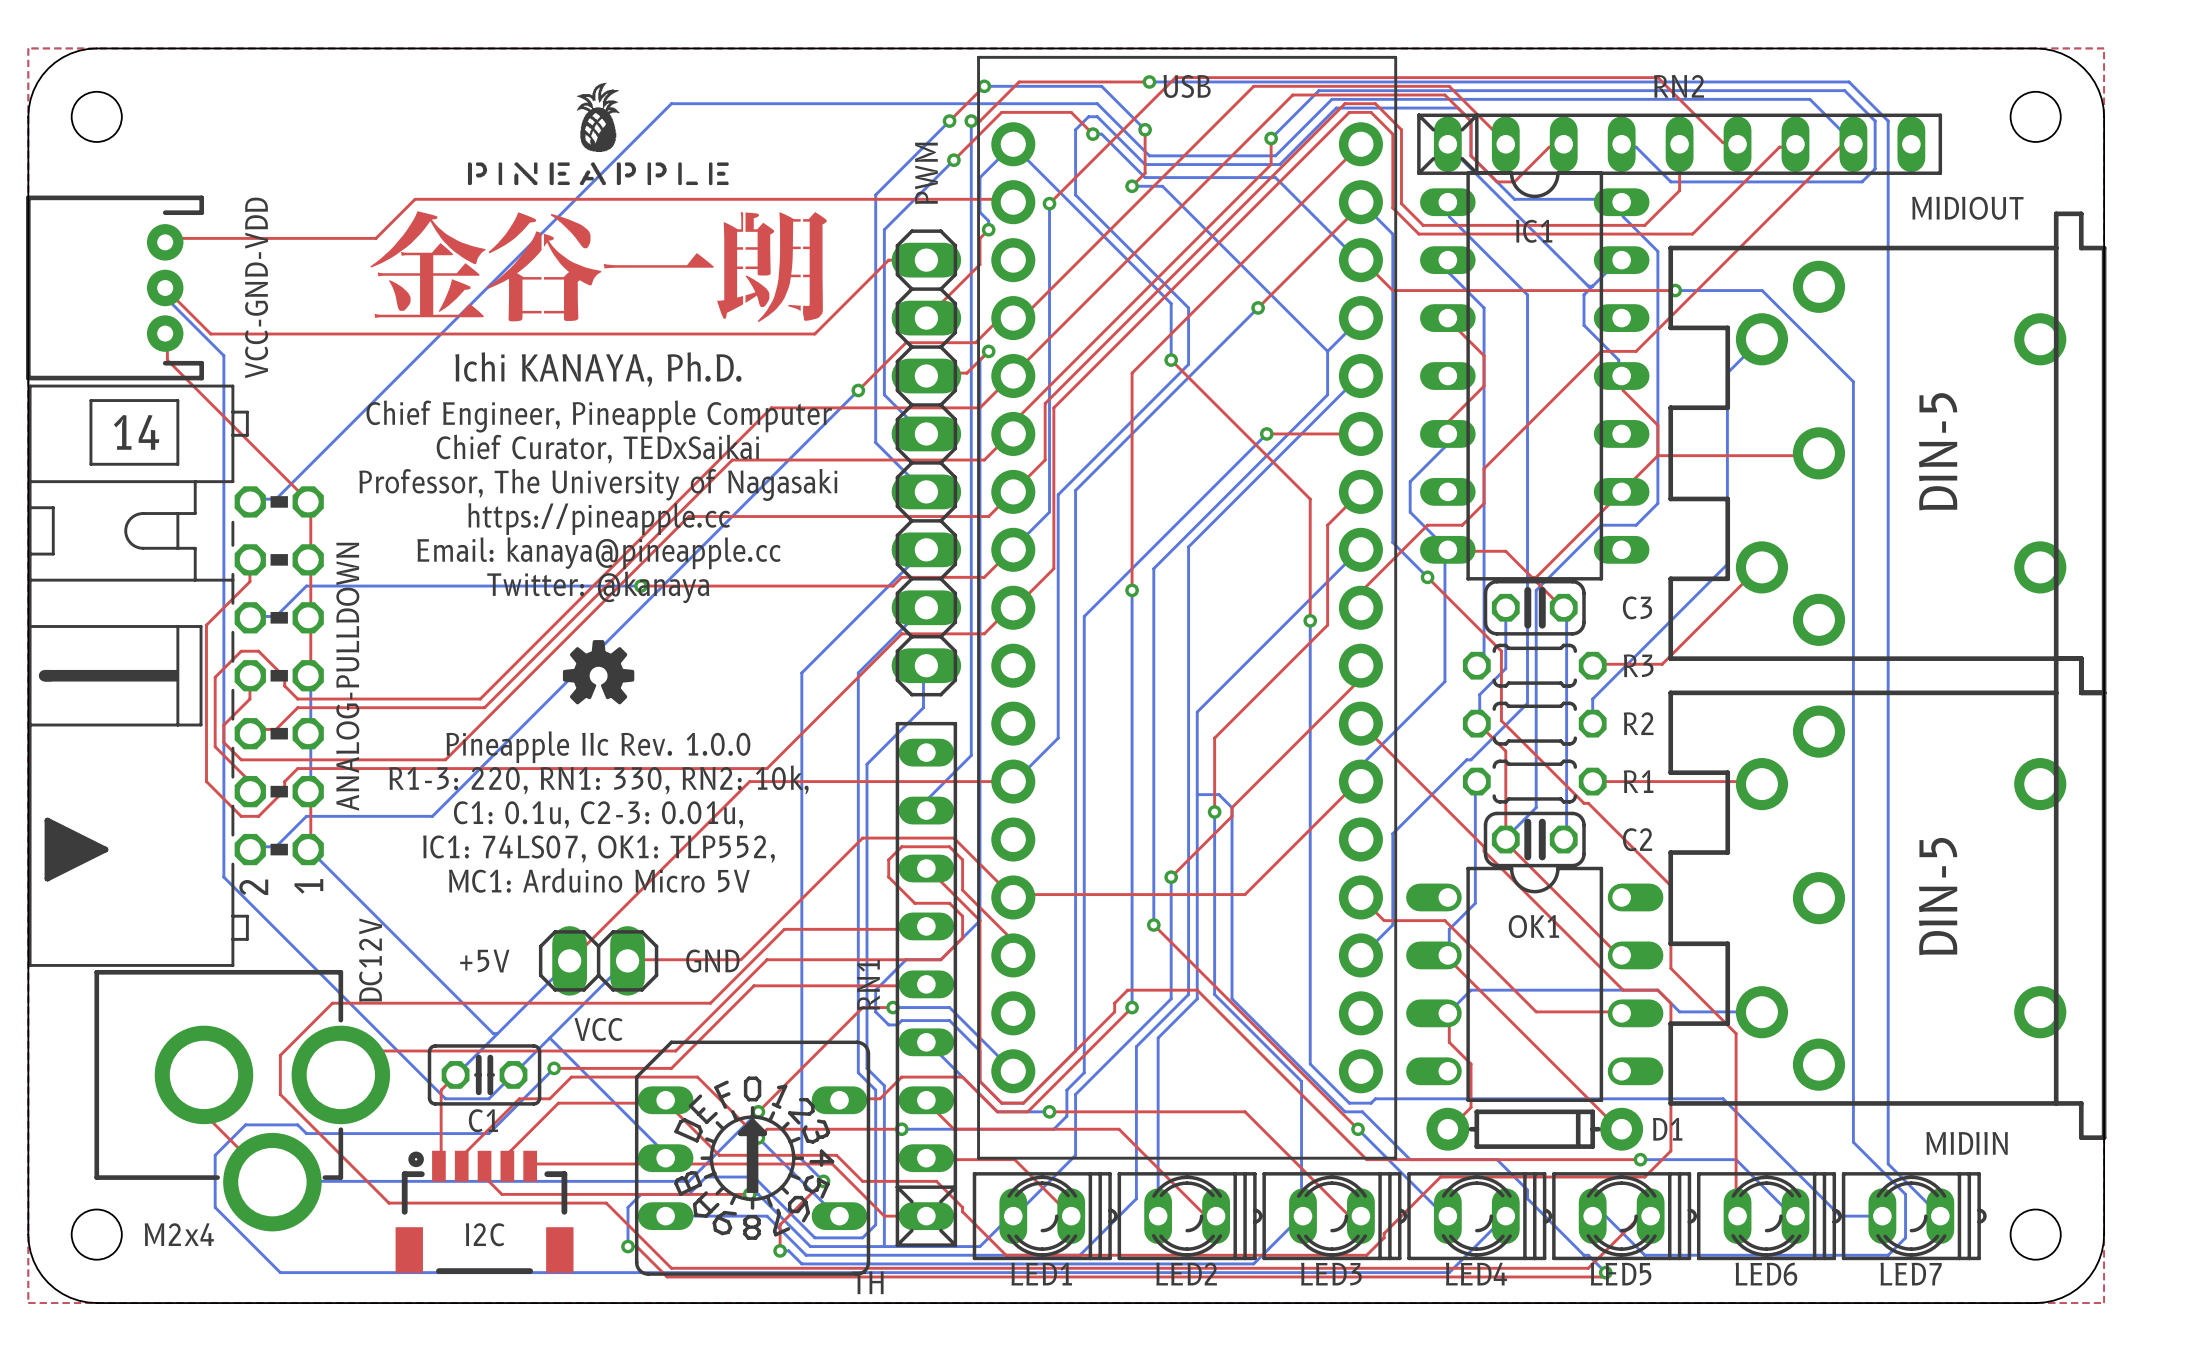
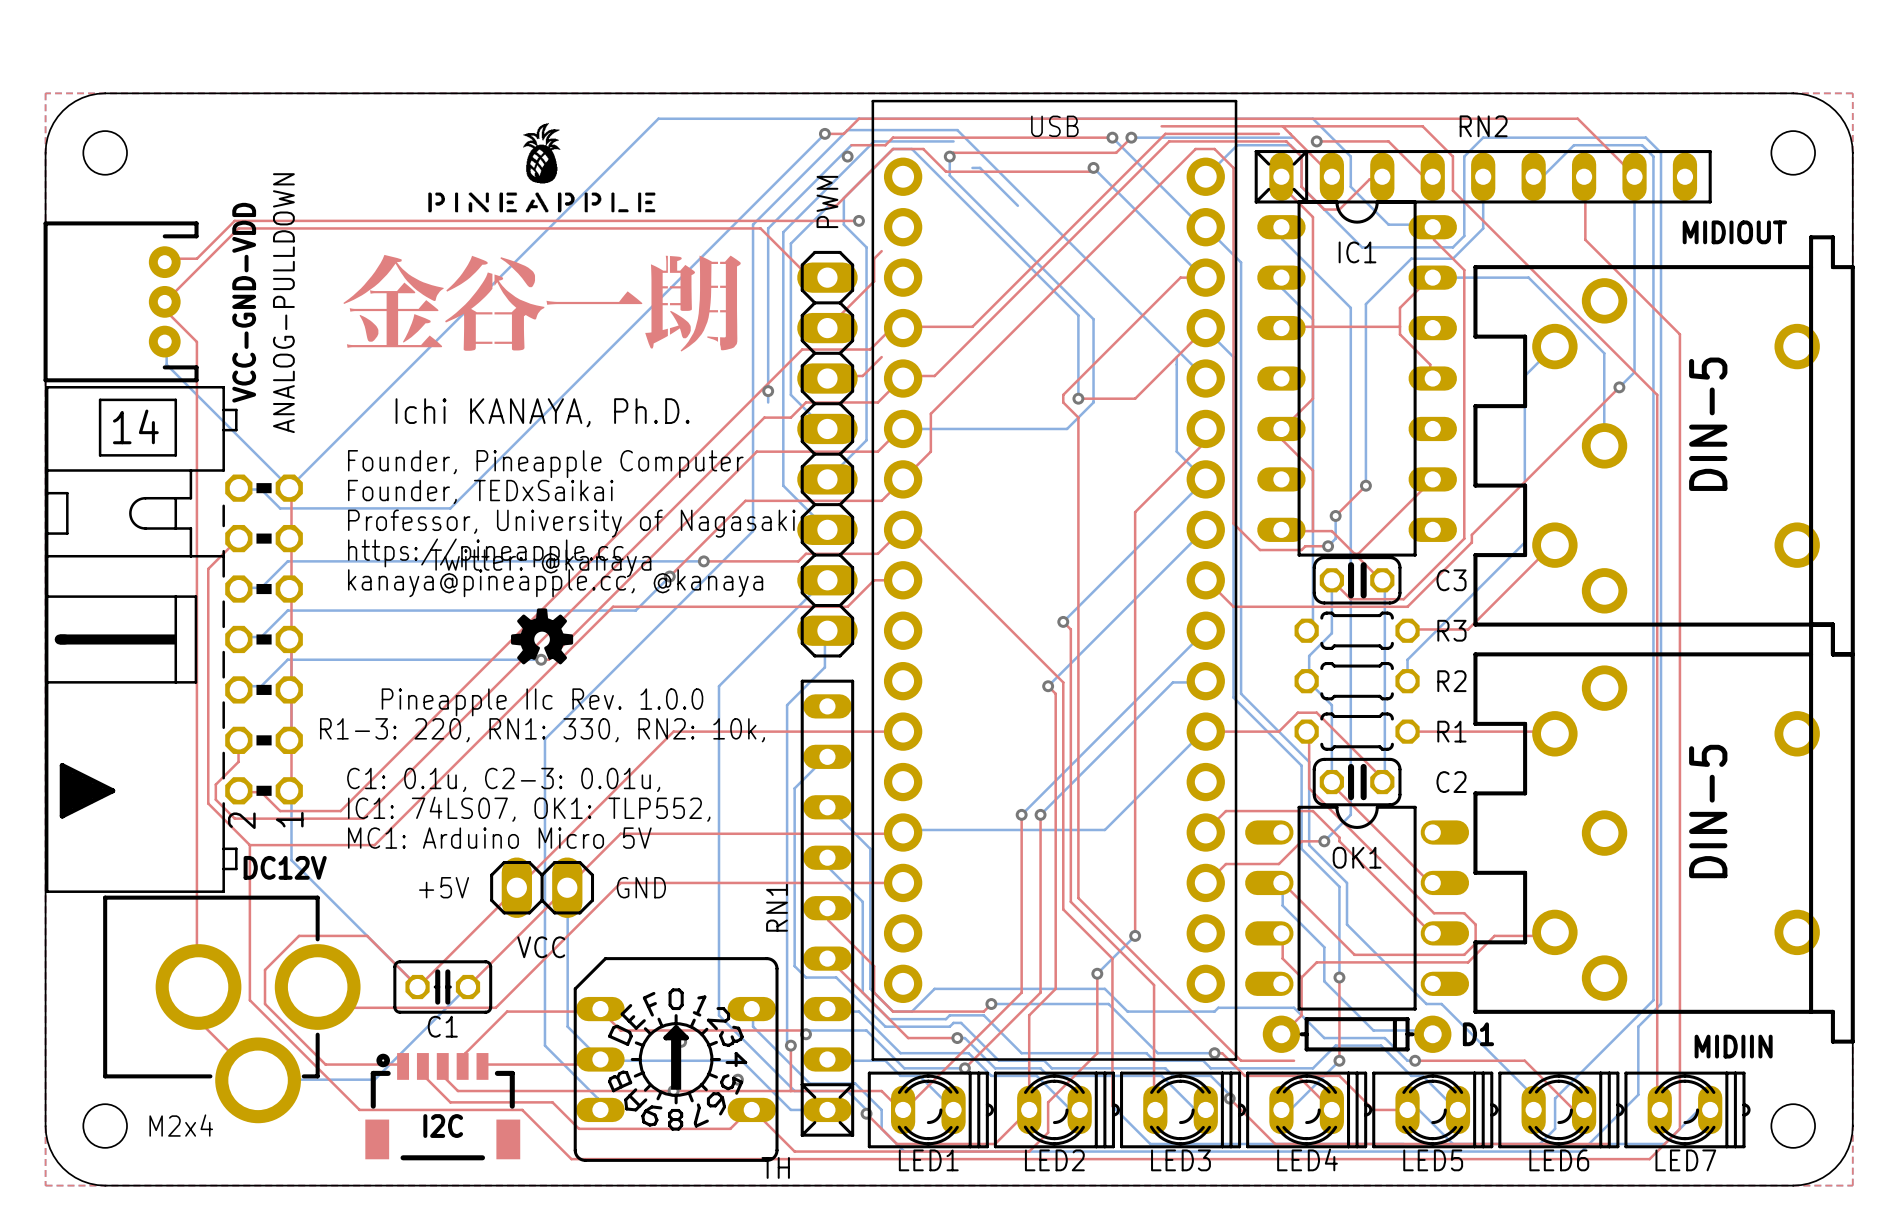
top track: (1175, 77) (1049, 203) -> (1044, 118) (858, 118) (843, 133) (824, 133)
top track: (1657, 77) (1723, 142) (1737, 144) -> (1464, 118) (1577, 118) (1634, 176)
top track: (1149, 81) (1019, 81) (1001, 99) -> (1112, 137) (893, 137)
bottom track: (1149, 81) (1849, 81) (1866, 99) -> none
via: (1149, 81) -> none
top track: (984, 86) (949, 121) -> none
bottom track: (984, 86) (1101, 86) (1145, 129) -> none
via: (984, 86) -> none
top track: (1310, 86) (1253, 86) (1023, 316) -> (1165, 133) (972, 326) (911, 326)
top track: none -> (1282, 126) (1422, 126) (1452, 156) (1452, 190) (1657, 394) (1657, 1109) (1659, 1109)
via: none -> (824, 133)
top track: (1314, 95) (1292, 95) (1014, 373) -> (1191, 141) (1169, 141) (934, 376) (904, 376)
top track: (1444, 95) (1453, 103) -> (1218, 141) (1286, 141)
bottom track: none -> (1112, 137) (1203, 228) (1205, 227)
via: none -> (1112, 137)
top track: none -> (1131, 137) (1116, 152) (953, 152) (949, 156)
via: none -> (1131, 137)
bottom track: (1331, 99) (1275, 155) (1149, 155) (1097, 103) (1071, 103) -> (1180, 137) (1131, 137)
bottom track: (1462, 99) (1679, 99) -> (1339, 224) (1362, 247) (1452, 247) (1464, 236) (1464, 156) (1483, 137)
bottom track: (1809, 99) (1853, 144) -> (1596, 137) (1645, 137)
bottom track: (979, 103) (671, 103) (276, 499) (254, 499) (250, 501) -> (824, 133) (450, 508) (280, 508) (261, 489) (238, 488)
top track: (1345, 103) (1045, 403) (1045, 416) -> none
top track: (1375, 103) (1401, 129) (1401, 203) (1423, 225) (1644, 225) (1679, 190) (1679, 144) -> none
top track: none -> (1316, 141) (1388, 141) (1422, 175) (1432, 176)
via: none -> (1316, 141)
bottom track: none -> (851, 145) (768, 228) (768, 402)
top track: (993, 108) (979, 121) (971, 121) -> (885, 145) (851, 145)
bottom track: (1397, 108) (1336, 108) (1279, 164) (1145, 164) (1097, 116) (1088, 116) (1075, 129) (1075, 194) (1188, 307) (1188, 364) (1058, 494) (1058, 738) (1013, 781) -> (1237, 145) (1205, 176)
bottom track: (1862, 108) (1844, 90) (1318, 90) (1271, 138) -> (1642, 145) (1574, 145) (1543, 175) (1533, 176)
top track: (1036, 112) (1071, 112) (1092, 134) -> (923, 149) (945, 171) (1089, 171) (1093, 167)
bottom track: (1883, 116) (1888, 121) (1888, 1163) (1940, 1216) -> (1661, 152) (1661, 1004) (1638, 1026) (1638, 1094) (1581, 1151) (1112, 1151)
bottom track: (949, 121) (875, 194) (875, 207) -> (874, 141) (783, 232)
bottom track: (971, 121) (971, 225) -> (843, 198) (843, 224) (866, 247)
via: (971, 121) -> none
bottom track: none -> (949, 156) (949, 175) (1093, 319) (1093, 402) (1067, 428) (903, 428)
top track: (1145, 129) (1145, 173) (1132, 186) -> none
via: (1145, 129) -> none
via position: (1092, 134) -> (949, 156)
via: none -> (1093, 167)
top track: (1271, 138) (1271, 164) (1014, 420) (1013, 433) -> none
via: (1271, 138) -> none
top track: (1360, 144) (1132, 373) (1132, 590) -> none
top track: none -> (1281, 176) (1282, 186) (1312, 217) (1312, 360)
bottom track: (1447, 144) (1588, 286) (1592, 286) -> none
bottom track: (1621, 144) (1623, 147) (1636, 147) (1670, 181) (1862, 181) (1875, 168) -> none
bottom track: none -> (1483, 176) (1483, 228) (1452, 258) (1411, 258) (1365, 304) (1365, 485)
top track: (1795, 144) (1792, 147) (1779, 147) (1692, 234) (1418, 234) (1392, 207) -> (1328, 546) (1305, 546) (1301, 550) (1259, 550) (1233, 523) (1233, 232)
top track: none -> (1584, 176) (1585, 239) (1679, 334) (1679, 1128) (1649, 1159) (571, 1159) (522, 1109) (359, 1109) (249, 1000) (249, 845)
top track: (1853, 144) (1853, 147) (1840, 147) (1636, 351) (1601, 351) (1484, 468) (1484, 481) -> none
bottom track: none -> (1634, 176) (1634, 372) (1619, 387)
top track: none -> (851, 190) (836, 205) (828, 205)
bottom track: none -> (851, 190) (893, 149) (911, 149) (1078, 315) (1078, 398)
via: (953, 160) -> none
bottom track: (945, 168) (884, 229) -> (828, 205) (790, 243) (790, 251)
bottom track: (1145, 177) (1275, 177) -> (1093, 167) (1131, 205)
bottom track: (1132, 186) (1162, 186) (1327, 351) (1360, 318) -> none
via: (1132, 186) -> none
via: none -> (858, 220)
bottom track: (1514, 199) (1570, 199) -> (164, 341) (166, 341) (166, 364) (289, 488) (658, 118) (1312, 118) (1350, 156) (1350, 186) (1388, 224)
top track: (1013, 202) (1010, 199) (415, 199) (375, 238) (202, 238) -> (858, 220) (234, 220) (196, 258)
top track: (1360, 202) (1362, 203) (1258, 307) -> none
top track: none -> (1432, 227) (1434, 239) (1464, 270) (1464, 421)
bottom track: (1621, 202) (1623, 216) (1657, 251) (1657, 503) (1636, 525) (1601, 525) (1536, 590) (1536, 807) (1505, 838) -> (1306, 681) (1331, 705) (1331, 780)
bottom track: (1049, 203) (1049, 512) (1013, 549) -> none
via: (1049, 203) -> none
bottom track: (988, 229) (988, 221) (979, 212) (979, 177) (1013, 144) (1171, 303) (1171, 360) -> none
via: (988, 229) -> none
bottom track: (1392, 234) (1392, 351) -> (1205, 328) (1233, 357)
bottom track: none -> (1233, 254) (1241, 262) (1241, 693) (1309, 761) (1309, 845) (1347, 882) (1347, 924) (1426, 1004) (1441, 1004) (1532, 1094) (1533, 1109)
top track: (906, 260) (888, 260) (814, 334) (210, 334) (167, 290) -> (809, 277) (760, 228) (238, 228) (164, 301)
top track: (1360, 260) (1392, 290) (1675, 290) -> none
bottom track: (1621, 260) (1618, 260) (1584, 294) (1584, 325) (1618, 360) (1618, 373) (1621, 376) -> none
drawing position: (598, 266) -> (542, 303)
bottom track: (165, 287) (167, 290) (167, 299) (223, 355) (223, 877) (445, 1098) (488, 1098) -> none
top track: none -> (166, 304) (166, 311) (196, 341) (196, 985) (198, 987)
bottom track: (1675, 290) (1762, 290) -> (1432, 277) (1528, 277) (1555, 304)
via: (1675, 290) -> none
bottom track: (1258, 307) (1075, 490) (1075, 1051) (1049, 1077) -> none
via: (1258, 307) -> none
top track: none -> (1205, 328) (1135, 398) (1078, 398)
top track: (1447, 318) (1484, 355) -> (1281, 328) (1399, 326)
top track: (165, 333) (167, 334) (167, 360) (308, 501) -> none
top track: (906, 342) (858, 390) -> (809, 349) (802, 349) (340, 811) (280, 811) (261, 792) (238, 790)
bottom track: (1818, 347) (1853, 381) (1853, 1142) (1905, 1194) (1905, 1237) -> (1604, 353) (1604, 445)
bottom track: (988, 351) (979, 360) (979, 920) (940, 959) (906, 959) (875, 990) (875, 1011) (888, 1024) (897, 1024) (901, 1020) (949, 1020) (979, 1051) (979, 1081) -> (827, 807) (870, 848) (870, 988) (874, 992)
via: (988, 351) -> none
top track: (1171, 360) (1310, 499) (1310, 620) -> none
via: (1171, 360) -> none
text position: Ichi KANAYA, Ph.D. (598, 369) -> Ichi KANAYA, Ph.D. (542, 412)
bottom track: (1360, 376) (1188, 546) (1188, 994) (1136, 1046) (1136, 1198) (1079, 1255) (806, 1255) (767, 1216) (665, 1216) -> (1205, 378) (957, 130) (847, 130) (753, 224) (753, 531) (544, 739) (544, 1045) (597, 1098) (597, 1109) (600, 1109)
top track: (1621, 376) (1623, 390) (1657, 425) -> (1432, 378) (1430, 376) (1430, 364) (1399, 334) (1399, 307) (1430, 277) (1432, 277)
top track: (1484, 386) (1449, 420) (1449, 433) -> (1312, 387) (1312, 398) (1282, 428) (1282, 440) (1312, 470)
top track: none -> (1619, 387) (1471, 534) (1471, 542) (1407, 606) (1233, 606) (1207, 580)
via: none -> (1619, 387)
bottom track: (858, 390) (432, 816) (306, 816) (276, 846) (254, 846) (250, 849) -> none
bottom track: (1327, 394) (1153, 568) (1153, 924) -> (1176, 394) (1176, 451) (1205, 479) (1063, 621)
via: none -> (1078, 398)
top track: (984, 403) (979, 407) (771, 407) (480, 699) (297, 699) (284, 685) (284, 677) (258, 651) (241, 651) (215, 677) -> (877, 402) (806, 402) (790, 417) (764, 417) (363, 818) (234, 818) (215, 799) (215, 784) (238, 761) (238, 740)
top track: (1053, 407) (1053, 568) (1013, 607) -> (938, 406) (930, 413)
text: Chief Engineer, Pineapple Computer (599, 416) -> none
top track: (1266, 433) (1358, 433) -> (1135, 935) (1135, 512) (1203, 444) (1203, 428)
bottom track: (1266, 433) (1084, 616) (1084, 1072) (1066, 1090) (1066, 1116) (1053, 1129) (901, 1129) -> none
via: (1266, 433) -> none
bottom track: (1447, 433) (1444, 433) (1444, 446) (1410, 481) (1410, 512) (1447, 549) (1444, 551) (1444, 681) (1362, 764) (1360, 781) -> (903, 832) (904, 829) (1104, 829) (1203, 731) (1205, 731)
bottom track: (875, 442) (926, 491) -> (783, 436) (783, 485) (827, 529)
bottom track: (971, 446) (971, 755) (927, 798) (926, 810) -> (866, 440) (827, 479)
text: Chief Curator, TEDxSaikai (597, 449) -> none
top track: (1818, 453) (1818, 455) (1657, 455) (1621, 491) -> none
top track: none -> (1464, 447) (1464, 538) (1403, 599) (1350, 599) (1331, 580)
top track: (845, 460) (732, 460) (484, 707) (297, 707) (276, 729) (254, 729) (250, 733) -> (756, 451) (548, 659) (541, 659)
text: none -> Founder, Pineapple Computer (545, 464)
text: Professor, The University of Nagasaki (598, 484) -> none
top track: (1360, 491) (1327, 525) (1327, 625) (1214, 738) -> (1205, 277) (1180, 277) (1063, 394) (1063, 402) (1078, 417) (1078, 693)
top track: none -> (1365, 485) (1335, 515)
via: none -> (1365, 485)
top track: (1484, 503) (1462, 525) (1427, 525) (1362, 590) (1362, 607) -> (1312, 489) (1312, 531)
text: none -> Founder, TEDxSaikai (480, 491)
top track: (832, 516) (688, 516) (445, 759) (241, 759) (223, 742) (223, 725) (249, 699) (250, 675) -> (745, 500) (669, 576)
text position: https://pineapple.cc (599, 519) -> https://pineapple.cc (485, 552)
bottom track: none -> (1335, 515) (1335, 538) (1328, 546)
via: none -> (1335, 515)
text: none -> Professor, University of Nagasaki (571, 523)
bottom track: (1392, 542) (1427, 577) -> (1233, 523) (1233, 697) (1301, 765) (1301, 848) (1339, 886) (1339, 977)
bottom track: (926, 549) (801, 672) (801, 729) -> (768, 637) (718, 686)
top track: none -> (903, 529) (911, 531) (1063, 682) (1063, 909) (1112, 958) (1112, 1106)
text: Email: kanaya@pineapple.cc (599, 553) -> none
top track: (249, 559) (249, 581) (206, 625) (206, 781) (241, 816) (258, 816) (284, 790) (284, 781) (297, 768) (767, 768) (901, 633) (984, 633) (1010, 607) -> (249, 845) (374, 845) (613, 606) (847, 606) (874, 580) (900, 580)
top track: none -> (238, 538) (208, 568) (208, 640)
via: none -> (1328, 546)
top track: (1427, 577) (1501, 651) (1501, 720) (1584, 803) (1588, 803) (1670, 885) (1670, 968) (1736, 1033) (1737, 1216) -> none
via: (1427, 577) -> none
top track: (641, 586) (784, 586) -> none
bottom track: none -> (579, 561) (703, 561)
via: (641, 586) -> none
via: none -> (703, 561)
bottom track: (1132, 590) (1132, 1007) -> none
via: (1132, 590) -> none
bottom track: none -> (669, 576) (635, 610) (287, 610) (261, 637) (242, 637) (238, 639)
via: none -> (669, 576)
text: none -> kanaya@pineapple.cc, @kanaya (555, 583)
bottom track: (1310, 620) (1310, 1064) (1349, 1103) -> (934, 988) (1104, 988) (1127, 1011) (1195, 1011)
via: (1310, 620) -> none
via: none -> (1063, 621)
top track: (1360, 665) (1358, 668) (1358, 681) (1232, 807) (1232, 816) (1171, 877) -> (964, 1068) (1040, 992) (1040, 814)
bottom track: none -> (1205, 630) (1021, 814)
bottom track: (858, 672) (858, 1072) (875, 1090) (875, 1224) (862, 1237) (814, 1237) (754, 1177) (706, 1177) (688, 1194) (641, 1194) (628, 1207) (628, 1246) -> none
top track: none -> (289, 639) (291, 640) (291, 686) (289, 689) (291, 690) (291, 739) (289, 740)
ANALOG-PULLDOWN name position: ANALOG-PULLDOWN (347, 676) -> ANALOG-PULLDOWN (283, 303)
bottom track: none -> (541, 659) (287, 659) (261, 686) (242, 686) (238, 689)
via: none -> (541, 659)
bottom track: (1527, 703) (1471, 759) (1466, 759) (1392, 833) (1392, 924) (1360, 955) -> (1350, 663) (1350, 814) (1324, 841)
bottom track: (1197, 712) (1197, 998) (1158, 1037) (1158, 1216) -> (1063, 671) (1048, 686)
top track: (1360, 723) (1484, 846) (1484, 851) -> (1306, 731) (1309, 731) (1309, 788) (1312, 792)
top track: (1476, 723) (1505, 751) (1505, 839) -> none
top track: none -> (1048, 686) (1055, 693) (1055, 988) (1029, 1015) (1029, 1109) (995, 1143)
via: none -> (1048, 686)
top track: (215, 746) (249, 781) (250, 791) -> (208, 701) (208, 803) (249, 845)
bottom track: (880, 751) (867, 764) (867, 1068) (884, 1085) (884, 1246) -> (787, 705) (787, 1041) (790, 1045)
top track: (1360, 781) (1358, 781) (1245, 894) (1014, 894) (1013, 897) (953, 838) (862, 838) (740, 959) (628, 959) -> (903, 832) (620, 833) (567, 886)
top track: none -> (1205, 731) (1278, 731) (1297, 712) (1316, 712) (1384, 780) (1382, 782)
bottom track: (1476, 781) (1475, 903) (1449, 929) (1449, 955) -> (1432, 1034) (1426, 1030) (1373, 1030) (1324, 981) (1324, 947) (1282, 905) (1282, 882)
bottom track: (1197, 794) (1218, 794) (1232, 807) (1232, 998) (1345, 1111) (1362, 1111) (1410, 1159) (1497, 1159) (1527, 1190) (1527, 1198) (1584, 1255) -> (1112, 1106) (1150, 1143) (1399, 1143)
bottom track: none -> (827, 756) (794, 788) (794, 966) (806, 977) (836, 977) (885, 1026) (949, 1026) (953, 1022) (961, 1022) (998, 1060) (1044, 1060) (1051, 1068) (1165, 1068) (1172, 1075) (1210, 1075) (1229, 1094) (1229, 1098)
top track: none -> (1078, 758) (1078, 898) (1241, 1060)
bottom track: (1214, 812) (1214, 994) (1301, 1081) (1301, 1216) -> none
via: (1214, 812) -> none
text position: C1: 0.1u, C2-3: 0.01u, (598, 814) -> C1: 0.1u, C2-3: 0.01u, (503, 779)
text position: IC1: 74LS07, OK1: TLP552, (598, 849) -> IC1: 74LS07, OK1: TLP552, (529, 809)
bottom track: (310, 851) (493, 1033) (497, 1033) -> (291, 792) (291, 860) (417, 987)
top track: (926, 868) (979, 920) (979, 1051) -> (827, 908) (828, 920) (874, 966)
top track: none -> (1021, 814) (1021, 992) (904, 1109) (900, 1109) (881, 1091) (673, 1091)
via: none -> (1021, 814)
bottom track: (1171, 877) (1171, 998) (1075, 1094) (1075, 1155) (1014, 1216) (1010, 1216) (979, 1246) (810, 1246) (758, 1194) (749, 1194) -> (1040, 814) (1172, 682) (1205, 681)
text position: MC1: Arduino Micro 5V (599, 880) -> MC1: Arduino Micro 5V (499, 838)
top track: (1360, 897) (1384, 920) (1444, 920) (1536, 1011) (1618, 1011) -> (1205, 832) (1225, 811) (1312, 811) (1339, 837) (1339, 841) (1430, 932)
top track: none -> (1324, 841) (1301, 841) (1278, 864) (1225, 864) (1205, 882)
via: none -> (1324, 841)
top track: (1153, 924) (1205, 977) -> (1063, 621) (1070, 629) (1070, 901)
via: (1153, 924) -> none
top track: (926, 926) (923, 929) (784, 929) (710, 1003) (332, 1003) (319, 1016) -> (516, 887) (417, 987) (367, 935) (299, 935)
top track: (1010, 955) (1010, 938) (962, 890) (962, 859) (949, 846) (901, 846) (888, 859) (888, 877) (914, 903) (949, 903) (962, 916) (962, 938) (940, 959) (767, 959) (675, 1051) (362, 1051) (340, 1074) -> none
top track: (1447, 955) (1444, 955) (1618, 1129) (1621, 1129) -> (1281, 882) (1354, 954) (1464, 954) (1475, 943)
DC12V name rotation: 0° (370, 960) -> 90° clockwise (285, 867)
bottom track: (569, 960) (455, 1074) -> none
top track: none -> (567, 887) (467, 987)
bottom track: (627, 960) (513, 1074) -> (567, 887) (567, 1026) (601, 1060) (741, 1060) (790, 1109) (827, 1109)
top track: (926, 984) (754, 985) (671, 1068) (554, 1068) -> none
top track: (893, 1007) (862, 1007) (758, 1111) -> none
bottom track: (893, 1007) (949, 1007) (1013, 1071) -> none
via: (893, 1007) -> none
top track: (1132, 1007) (1027, 1111) (997, 1111) -> (957, 1038) (908, 1038) (889, 1019)
via: (1132, 1007) -> none
top track: none -> (1554, 932) (1551, 935) (1494, 935) (1468, 962) (1316, 962) (1301, 977)
bottom track: (1761, 1012) (1679, 1011) (1657, 990) (1471, 990) (1447, 1013) -> none
bottom track: none -> (1135, 935) (1097, 973)
via: none -> (1135, 935)
top track: (1670, 1024) (1670, 1150) (1644, 1177) (1514, 1177) -> (1407, 1109) (1373, 1109) (1339, 1075)
bottom track: (549, 1037) (667, 1155) (665, 1158) -> none
bottom track: (926, 1042) (966, 1081) -> (827, 857) (828, 867) (862, 901) (862, 992)
via: none -> (1097, 973)
top track: none -> (1339, 977) (1339, 1060)
via: none -> (1339, 977)
bottom track: (554, 1068) (488, 1133) (306, 1133) (297, 1124) (245, 1124) (215, 1155) (215, 1207) (280, 1272) (1449, 1272) (1505, 1216) -> none
via: (554, 1068) -> none
top track: (1301, 1072) (1358, 1129) -> (1154, 985) (1155, 1109)
top track: (455, 1074) (441, 1090) (441, 1163) (438, 1166) -> (325, 1064) (401, 1064) (403, 1066)
top track: (962, 1077) (901, 1077) (880, 1098) (839, 1100) -> (858, 988) (827, 958)
bottom track: none -> (991, 1004) (1108, 1004) (1157, 1053) (1214, 1053)
via: none -> (991, 1004)
top track: (519, 1098) (462, 1155) (461, 1166) -> (473, 1007) (336, 1007) (317, 987)
top track: (545, 1098) (549, 1098) (571, 1077) (697, 1077) (758, 1137) (767, 1129) (901, 1129) -> (495, 1007) (620, 882) (900, 882)
bottom track: (1462, 1098) (1723, 1098) (1840, 1216) (1882, 1216) -> (1294, 1007) (1324, 1038) (1384, 1038) (1407, 1060) (1415, 1060)
top track: (926, 1100) (953, 1129) (1119, 1129) (1205, 1216) (1216, 1216) -> none
bottom track: none -> (827, 1009) (828, 1011) (858, 1011) (900, 1053) (968, 1053) (991, 1075) (1036, 1075) (1070, 1109) (1079, 1109)
top track: (1023, 1103) (1114, 1011) (1114, 1003) (1127, 990) (1197, 990) (1366, 1159) (1401, 1159) -> (911, 1011) (983, 1011) (991, 1004)
bottom track: (801, 1107) (801, 1159) (823, 1181) -> (718, 1015) (794, 1091) (847, 1091) (866, 1109) (866, 1113)
bottom track: (758, 1111) (688, 1181) (406, 1181) -> (446, 1007) (374, 1079)
via: (758, 1111) -> none
top track: (1049, 1111) (1245, 1111) (1349, 1216) (1360, 1216) -> none
bottom track: none -> (934, 1019) (945, 1019) (949, 1015) (983, 1015) (1021, 1053) (1146, 1053) (1154, 1060) (1203, 1060) (1210, 1068) (1312, 1068) (1335, 1045) (1381, 1045) (1411, 1075) (1422, 1075) (1457, 1109)
via: (1049, 1111) -> none
top track: (688, 1124) (719, 1155) (836, 1155) (862, 1181) (936, 1181) (962, 1207) (962, 1211) (971, 1220) -> (620, 1030) (802, 1030)
bottom track: none -> (802, 1030) (866, 1030) (904, 1068) (964, 1068)
bottom track: (1358, 1129) (1444, 1216) (1447, 1216) -> (1339, 1060) (1290, 1109) (1281, 1109)
via position: (1358, 1129) -> (1214, 1053)
bottom track: none -> (957, 1038) (964, 1038) (995, 1068) (1040, 1068) (1048, 1075) (1161, 1075) (1195, 1109) (1205, 1109)
via: none -> (957, 1038)
bottom track: (758, 1137) (836, 1216) (839, 1216) -> none
top track: none -> (790, 1045) (790, 1091)
via: none -> (790, 1045)
top track: (665, 1158) (671, 1163) (832, 1163) (884, 1216) (926, 1216) -> none
top track: (926, 1158) (1014, 1159) (1071, 1216) -> none
bottom track: none -> (827, 1059) (885, 1060) (900, 1075) (919, 1075) (953, 1109)
top track: (1462, 1159) (1601, 1159) -> none
via: none -> (1339, 1060)
top track: none -> (1449, 1060) (1524, 1060) (1574, 1109) (1584, 1109)
bottom track: (1640, 1159) (1736, 1159) (1792, 1216) (1795, 1216) -> none
via position: (1640, 1159) -> (1415, 1060)
top track: (349, 1163) (389, 1203) (606, 1203) (610, 1207) -> (422, 1066) (423, 1075) (450, 1102) (552, 1102)
via: none -> (964, 1068)
top track: (1440, 1177) (1384, 1233) (1384, 1237) (1366, 1255) (1119, 1255) -> (1275, 1075) (1244, 1075) (1222, 1053) (1214, 1053)
top track: none -> (1297, 1075) (1331, 1109)
top track: (823, 1181) (780, 1224) (780, 1250) -> none
top track: none -> (1229, 1098) (1275, 1143) (1608, 1143)
via: none -> (1229, 1098)
bottom track: (1301, 1216) (1253, 1263) -> none
top track: (1650, 1216) (1640, 1216) (1588, 1268) (671, 1268) (641, 1237) -> (1097, 973) (1097, 1053) (1048, 1102) (1048, 1132) (1029, 1151) (794, 1151) (753, 1109) (749, 1109) (730, 1128) (579, 1128)
bottom track: none -> (1710, 1109) (1698, 1109) (1679, 1128)
via: none -> (866, 1113)
top track: (628, 1246) (636, 1246) (667, 1276) (1601, 1276) (1605, 1272) -> none
via: (628, 1246) -> none
bottom track: (780, 1250) (788, 1250) (801, 1263) (1014, 1263) -> (751, 1009) (753, 1026) (809, 1083) (855, 1083) (881, 1109) (881, 1128) (904, 1151)
via: (780, 1250) -> none
bottom track: (1588, 1255) (1605, 1272) -> none
bottom track: (1744, 1255) (1823, 1255) -> (1539, 1143) (1555, 1128) (1555, 1098) (1653, 1000) (1653, 198)
via: (1605, 1272) -> none

